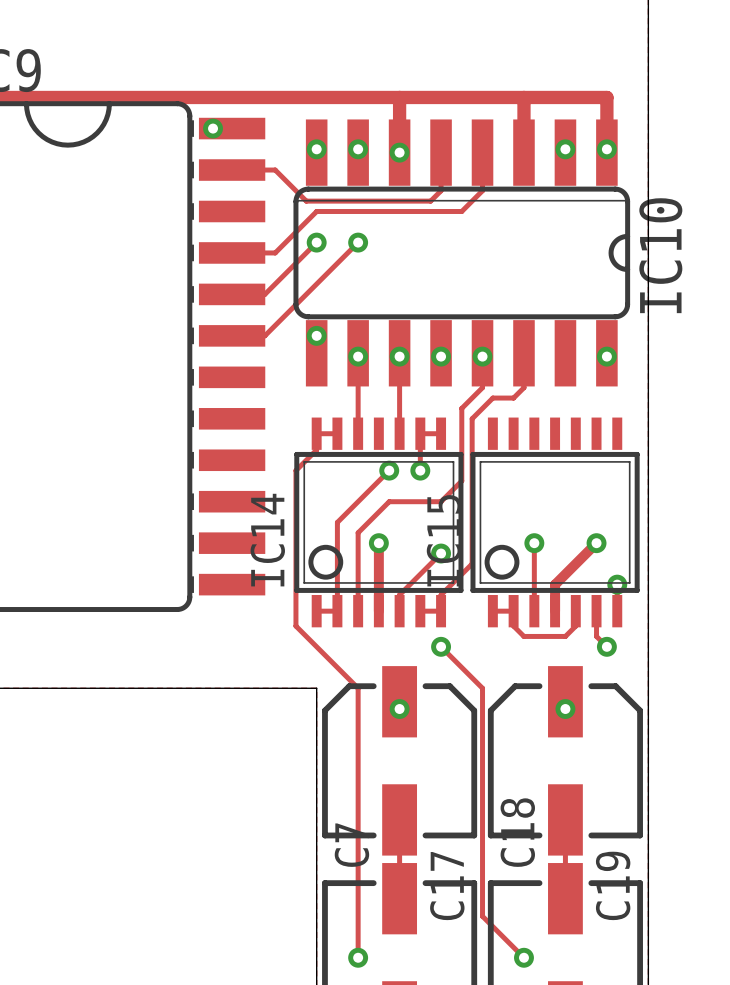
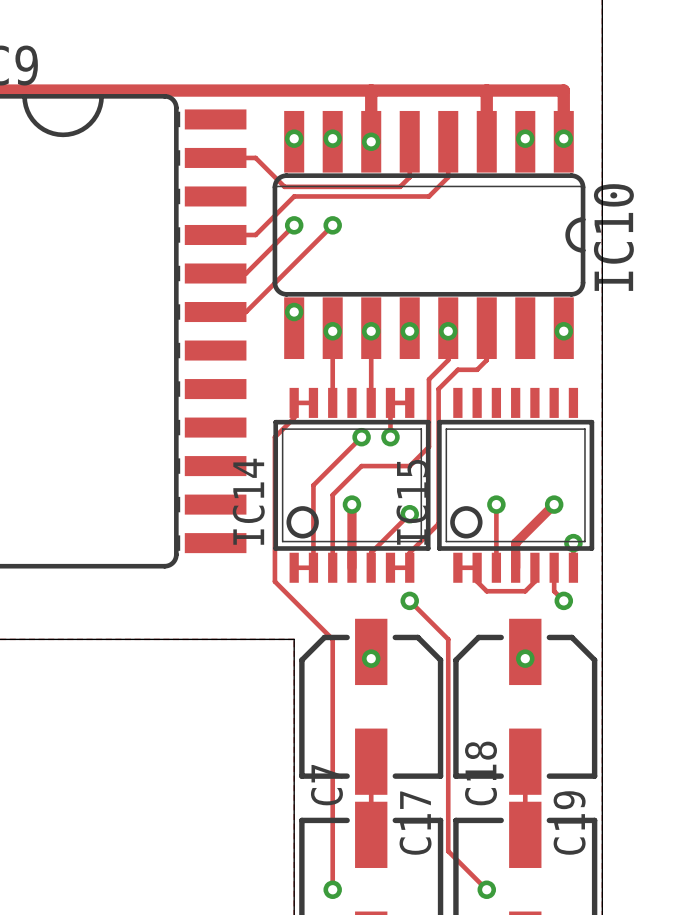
via: (213, 128) -> none

